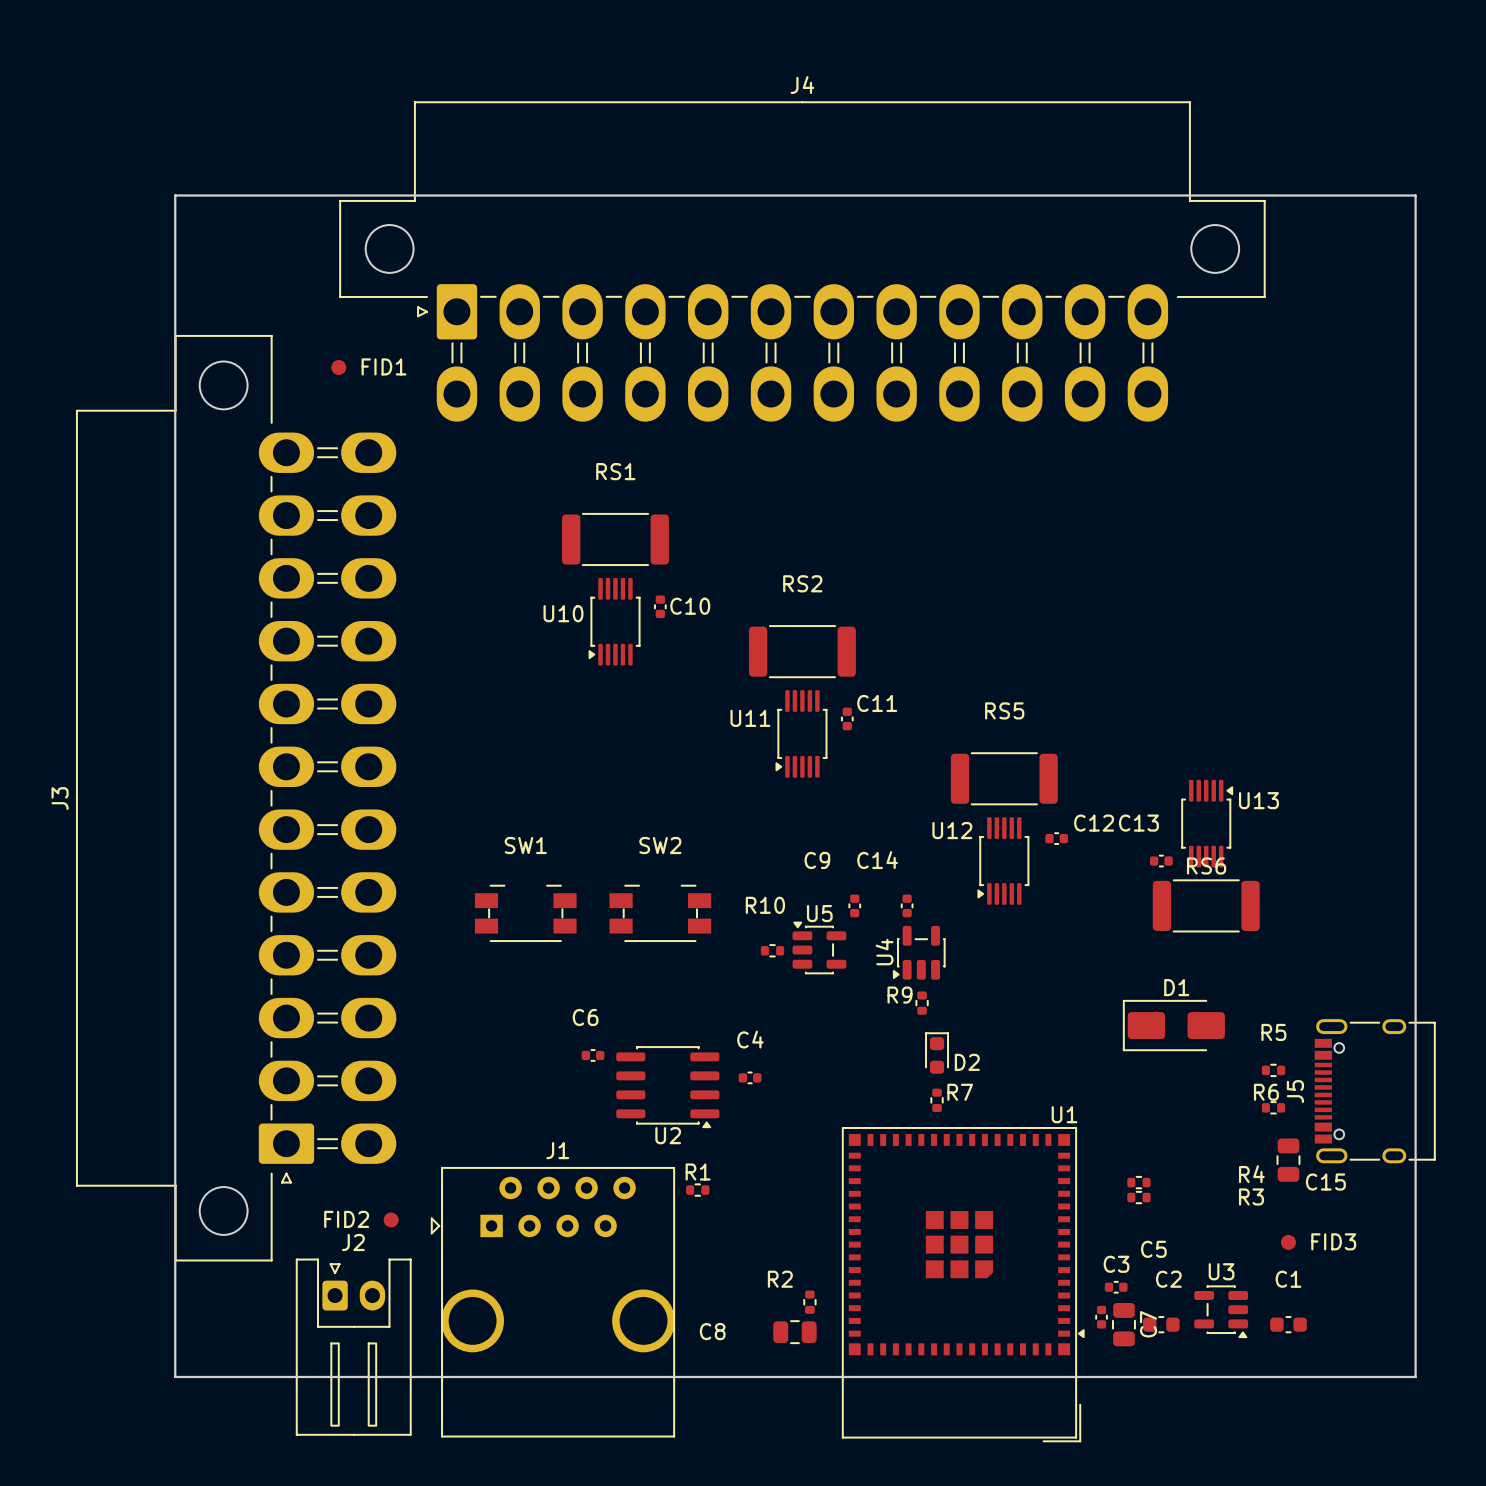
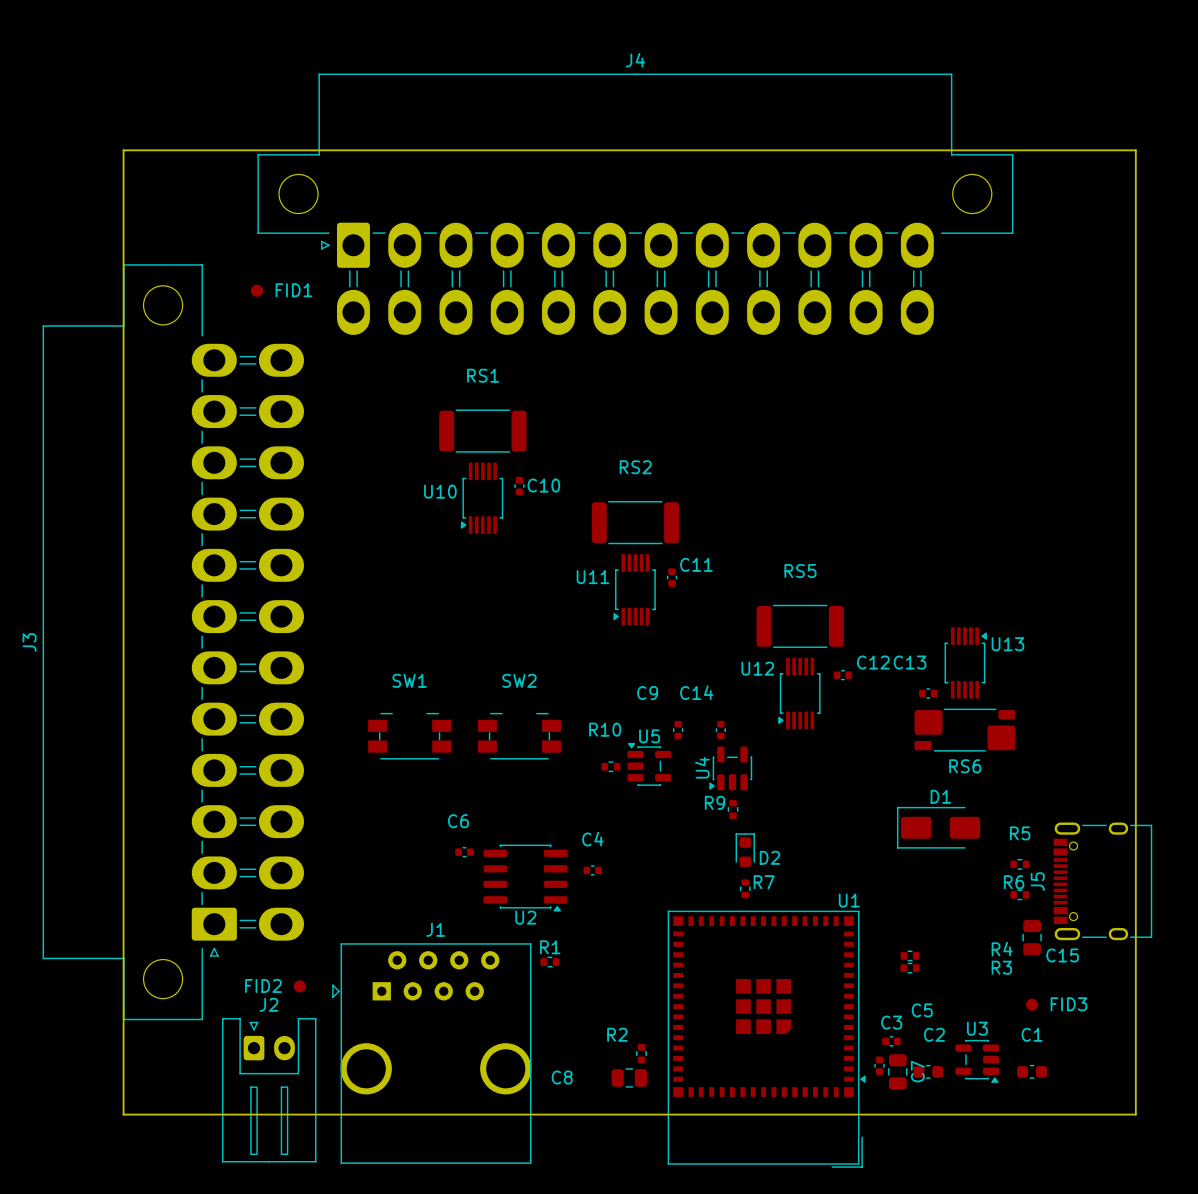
RS6 name position: RS6 (1206, 866) -> RS6 (965, 766)
RS6 footprint: [1152, 879, 1260, 933] -> [914, 708, 1016, 752]

